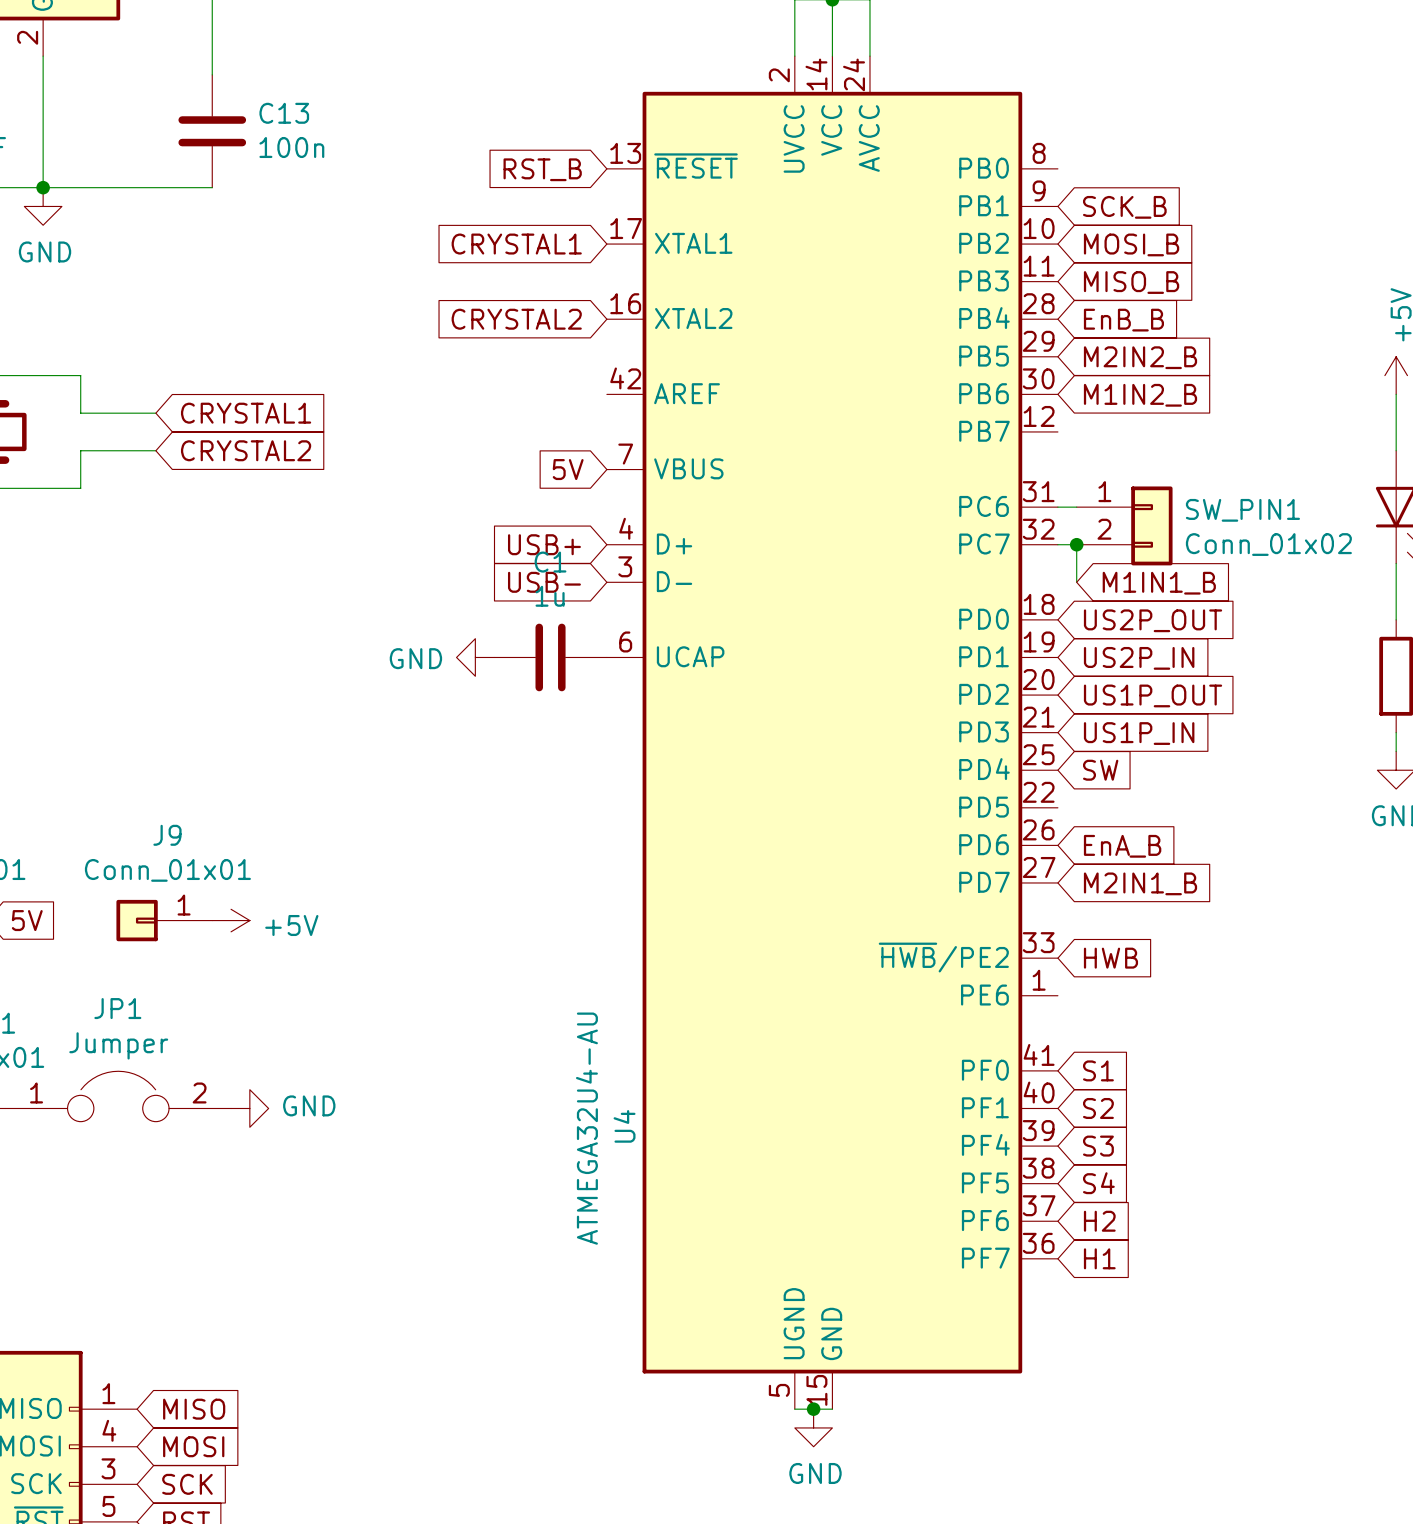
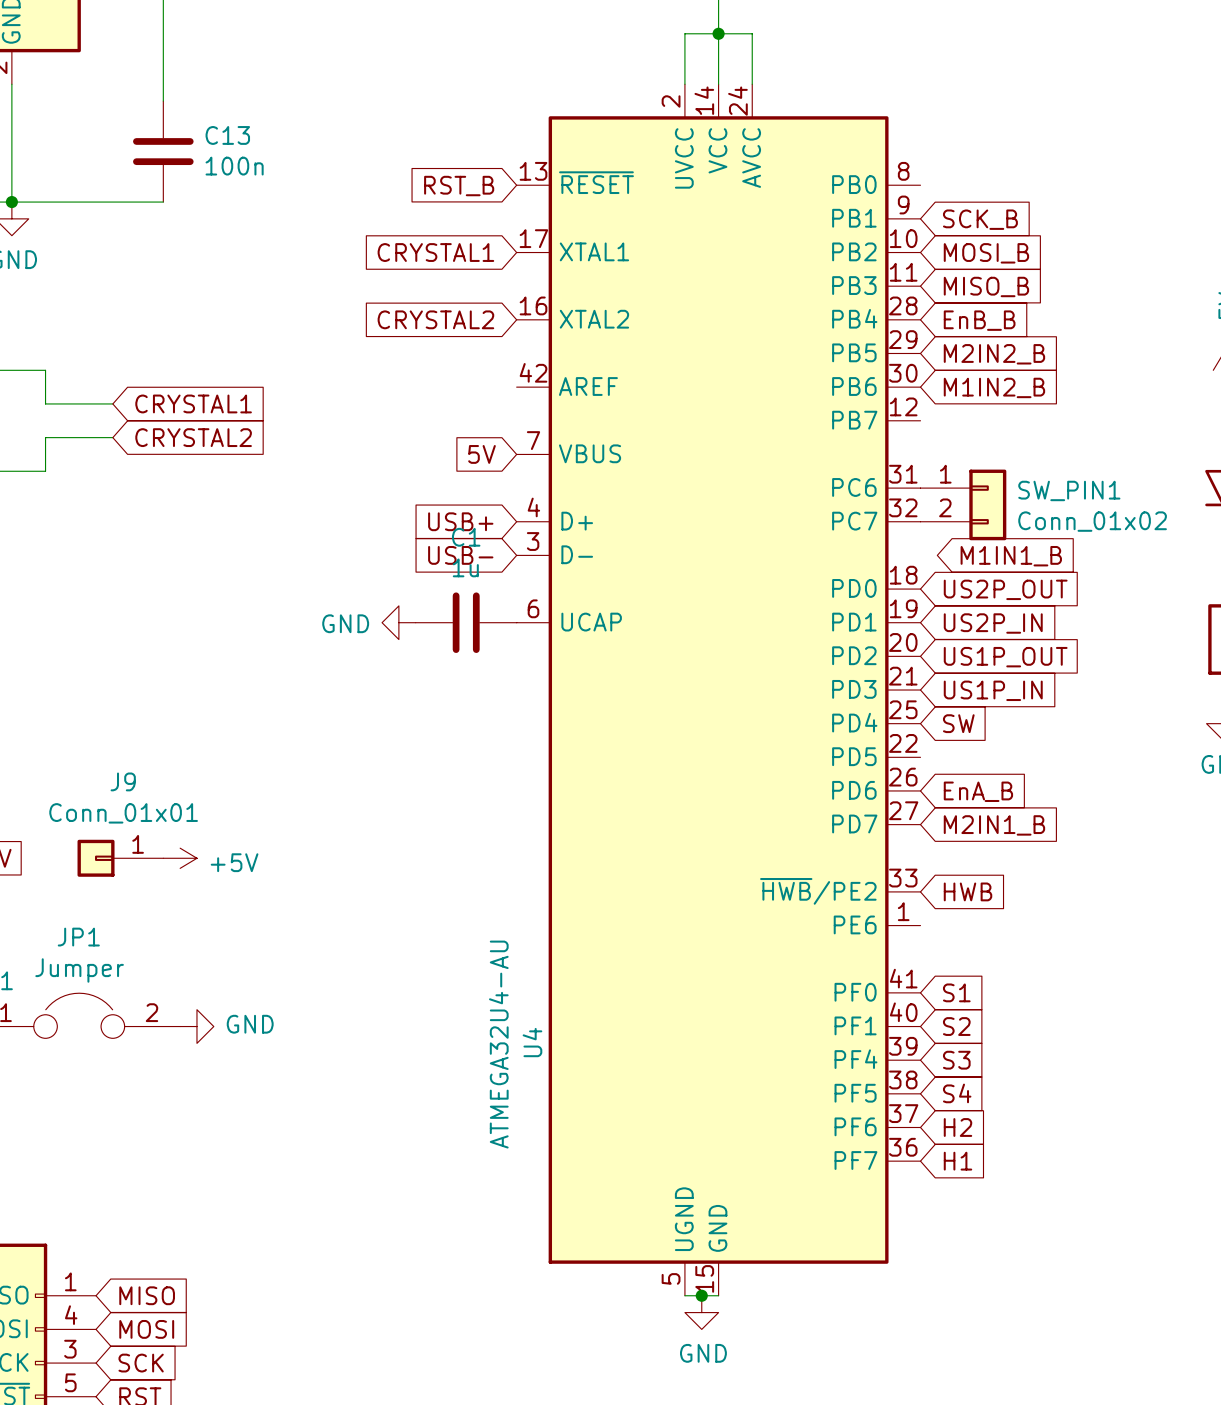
SW_PIN1 position: (1124, 525) -> (963, 504)
wire: (1057, 544) (1076, 544) (1076, 582) -> none
junction: (1076, 544) -> none

